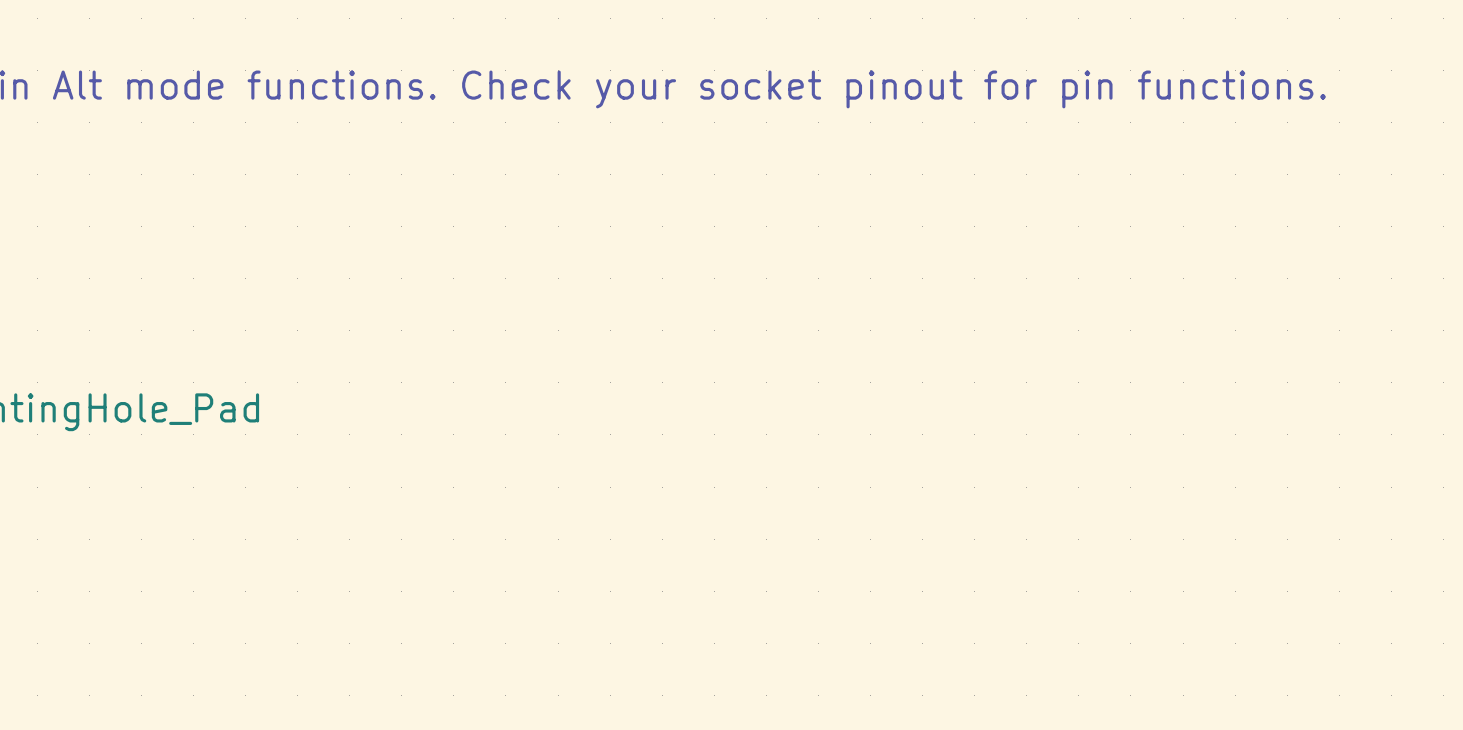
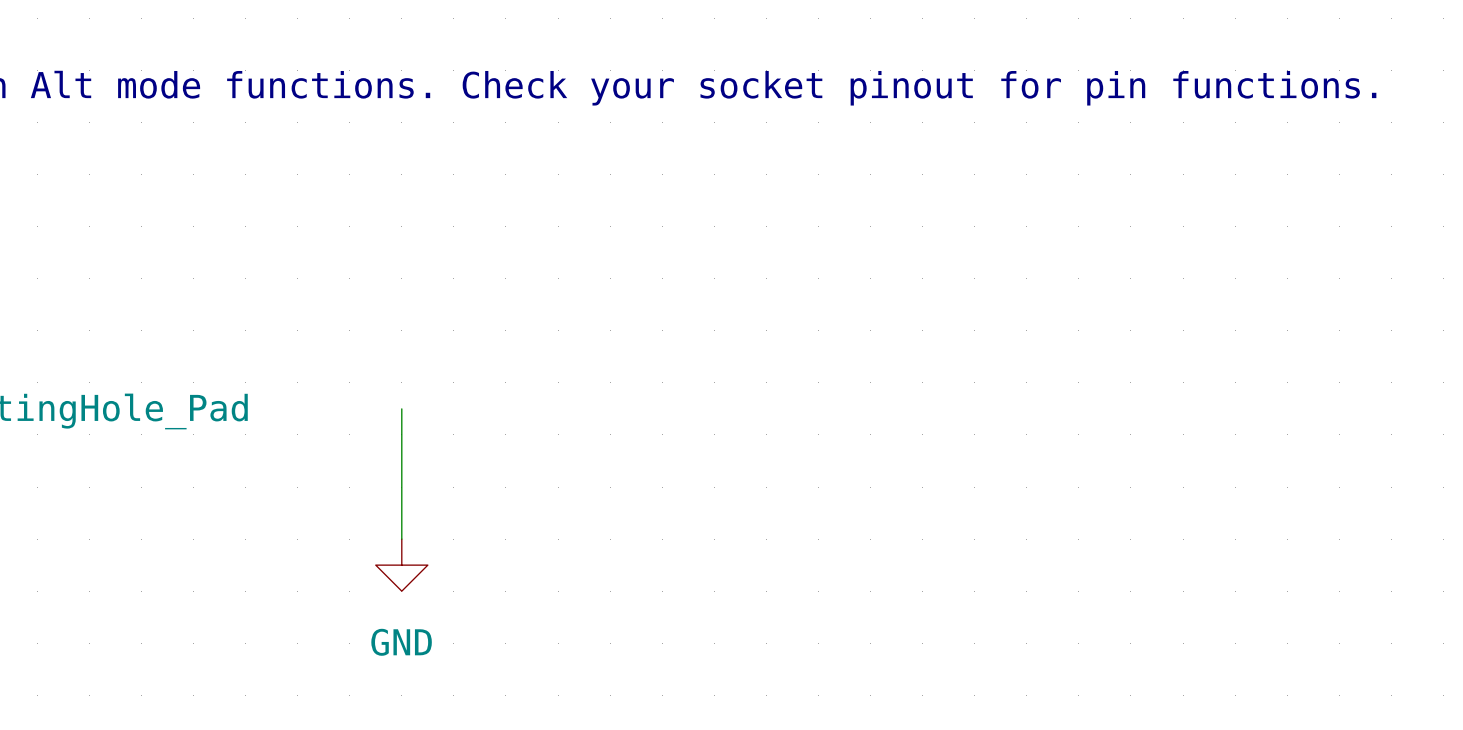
wire: none -> (401, 408) (401, 539)
power symbol: none -> GND (401, 565)

